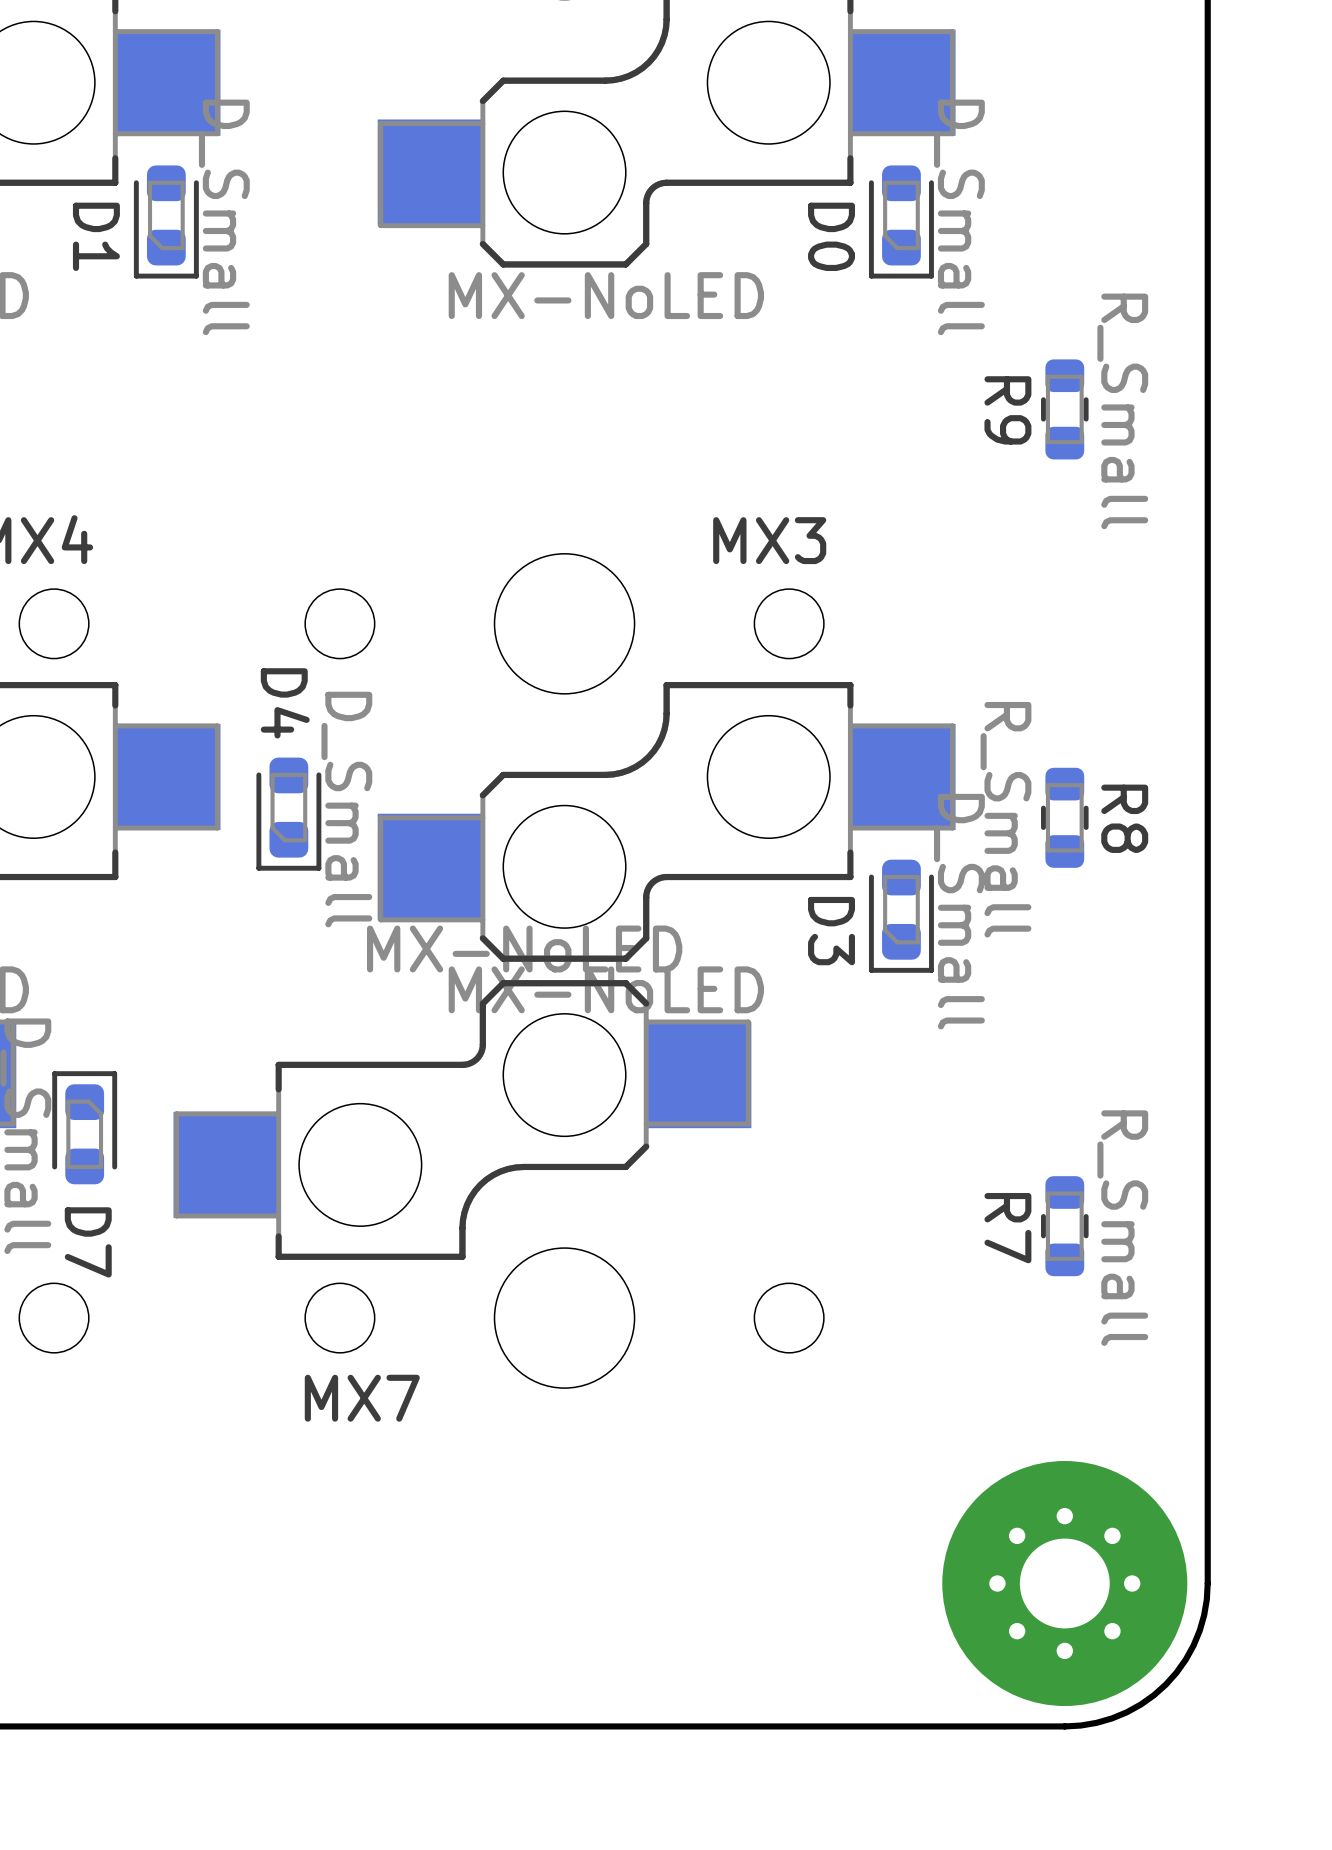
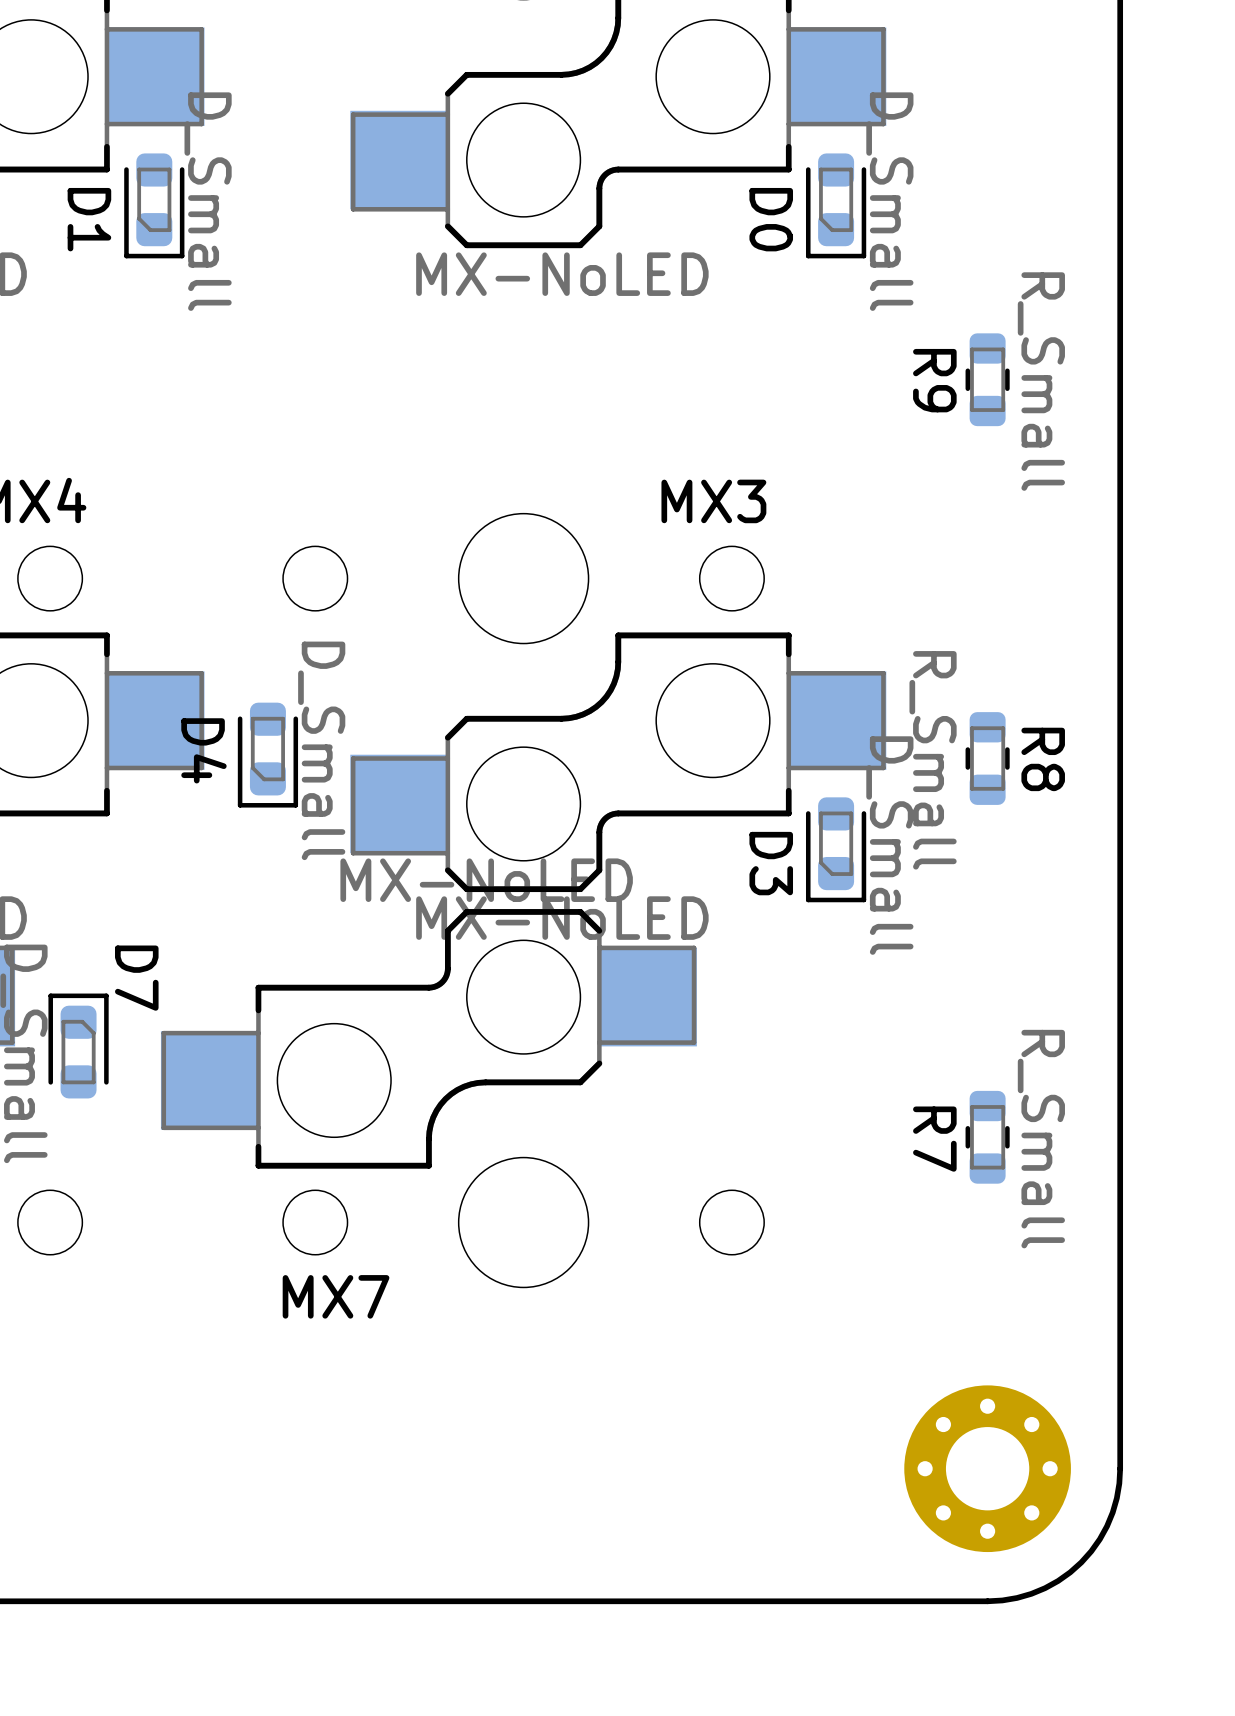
D4 name position: D4 (285, 703) -> D4 (203, 750)
D7 name position: D7 (88, 1242) -> D7 (136, 978)
part footprint: [942, 1461, 1188, 1707] -> [904, 1385, 1071, 1553]

